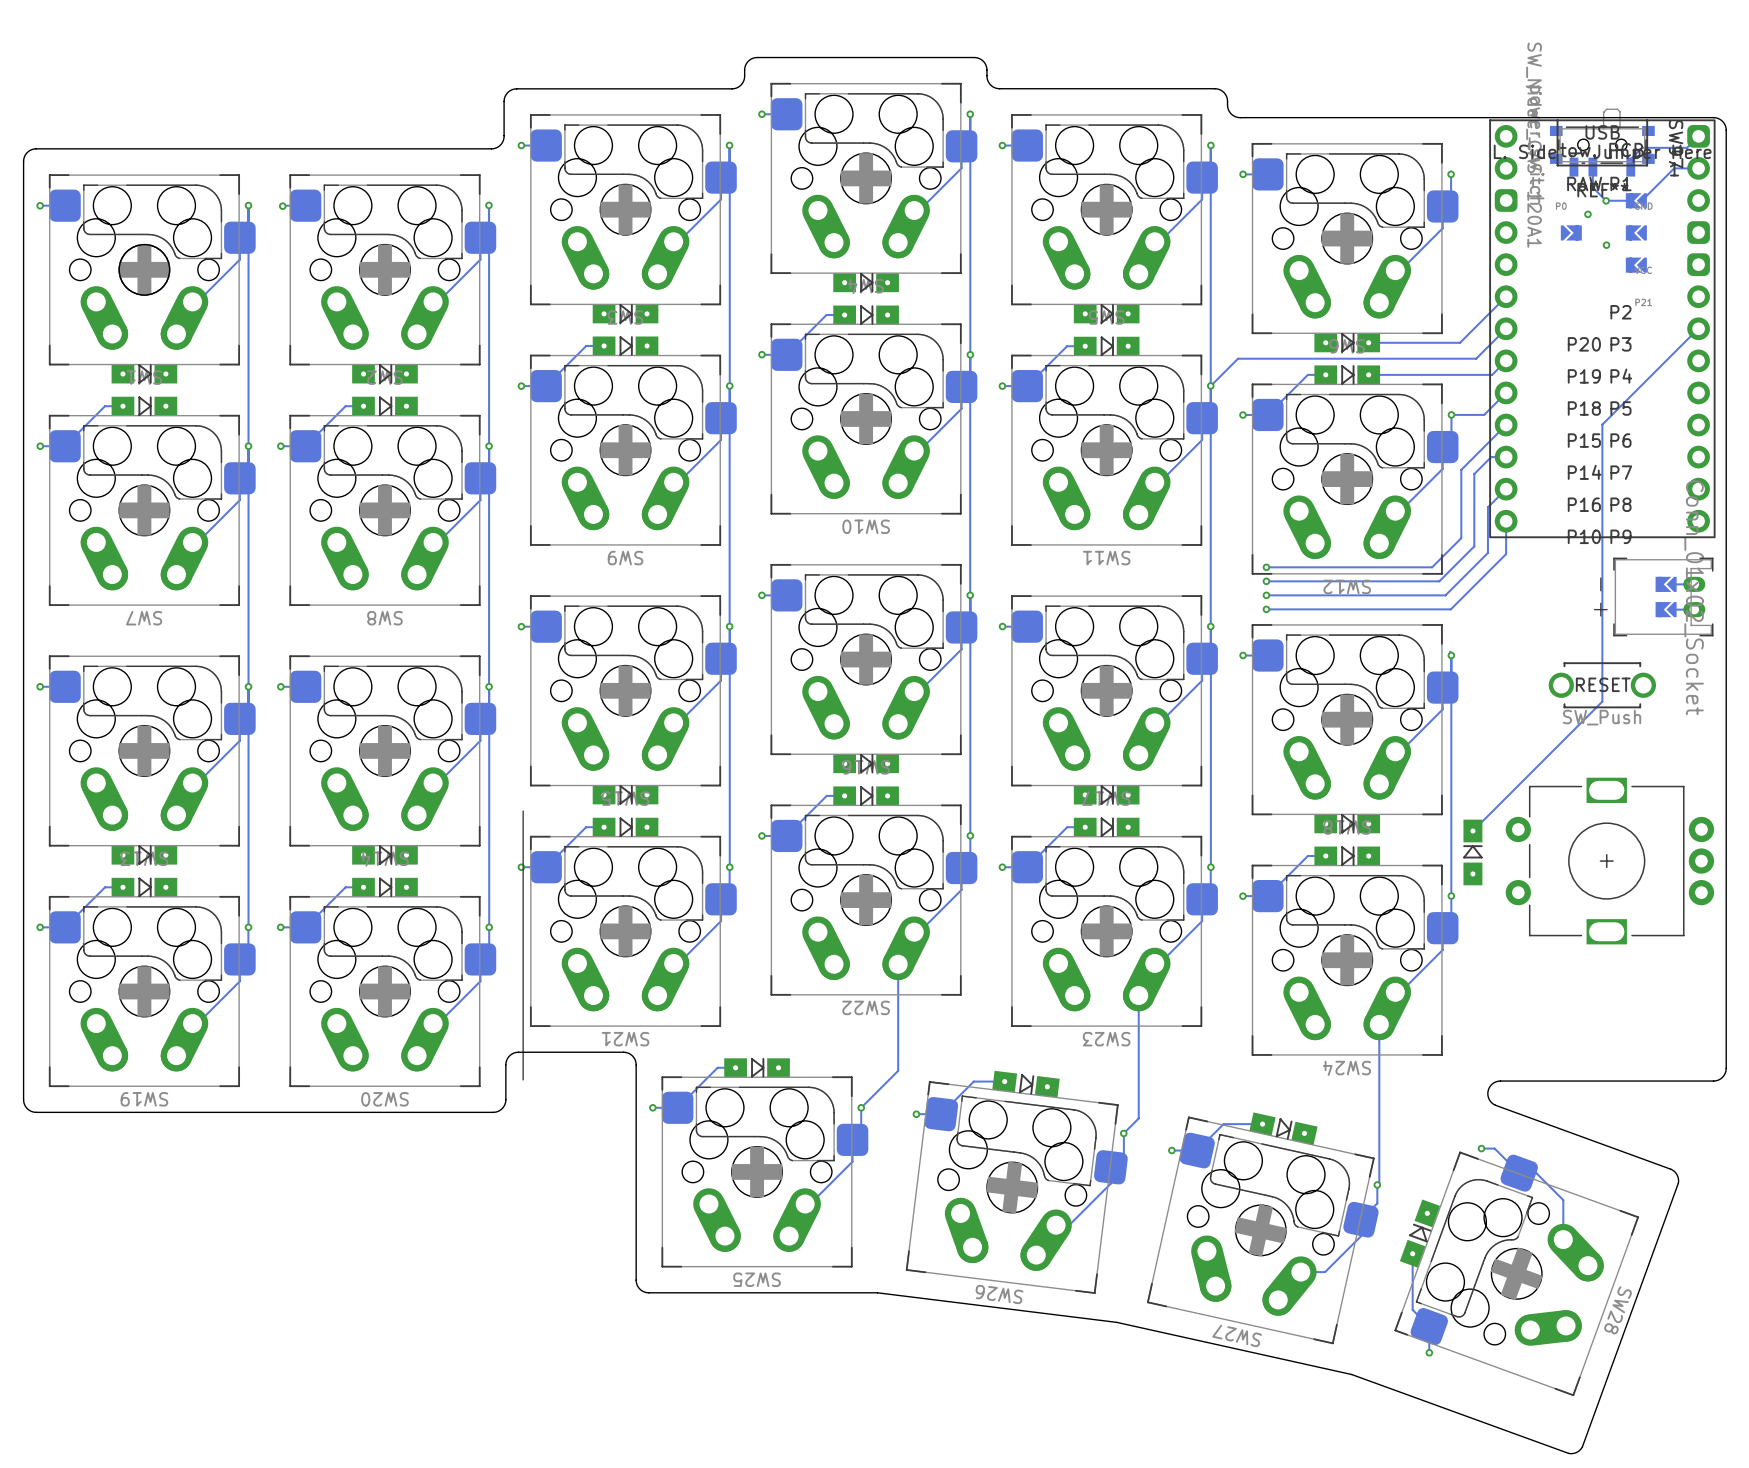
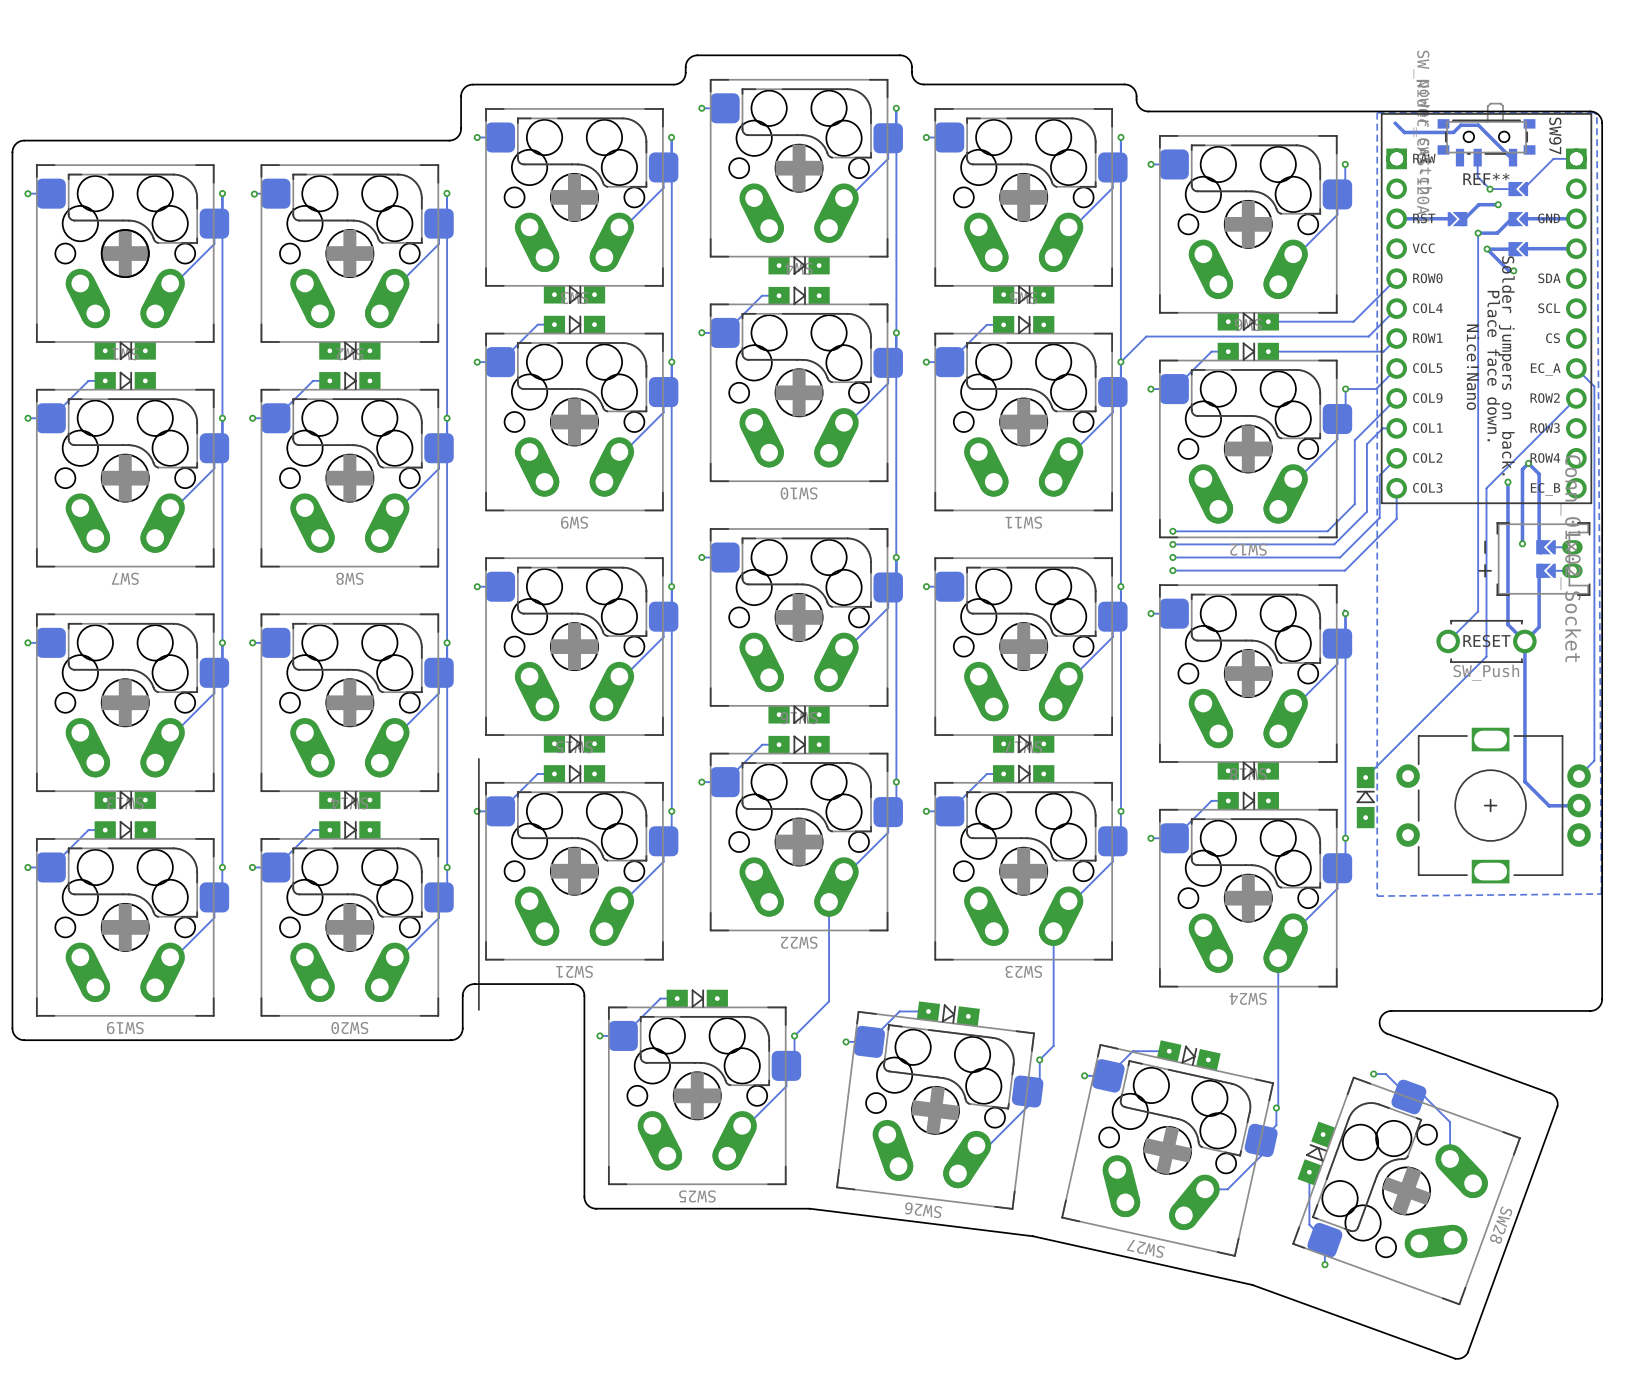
zone outline: none -> (1593, 112) (1377, 112) (1377, 896) (1601, 894) (1596, 114) (1593, 112)
part footprint: [1489, 119, 1716, 539] -> [1380, 113, 1593, 505]
track: (1698, 136) (1687, 147) (1642, 147) (1630, 159) (1630, 167) -> (1395, 123) (1404, 132) (1453, 132) (1460, 125) (1478, 125) (1510, 157) (1513, 157)
via: (1587, 214) -> none
track: none -> (1498, 204) (1478, 204) (1464, 219)
via: none -> (1498, 204)
track: none -> (1396, 218) (1452, 219)
track: none -> (1511, 219) (1497, 233) (1478, 233) (1478, 611) (1448, 641)
track: none -> (1576, 218) (1523, 219)
via: (1606, 245) -> none
via: none -> (1478, 233)
track: none -> (1576, 248) (1523, 249)
track: none -> (1487, 249) (1508, 270) (1513, 270)
via: none -> (1487, 249)
track: none -> (1511, 249) (1487, 249)
via: none -> (1513, 270)
track: (1698, 328) (1602, 424) (1602, 521) -> (1576, 398) (1486, 488)
track: none -> (1576, 368) (1594, 386) (1594, 760) (1579, 776)
via: none -> (1528, 463)
track: none -> (1507, 482) (1507, 624) (1524, 641) (1524, 781) (1549, 805) (1579, 805)
via: none -> (1507, 482)
track: none -> (1522, 543) (1522, 469) (1528, 463) (1539, 474) (1539, 547)
via: none -> (1522, 543)
track: none -> (1539, 570) (1539, 627) (1524, 641)

